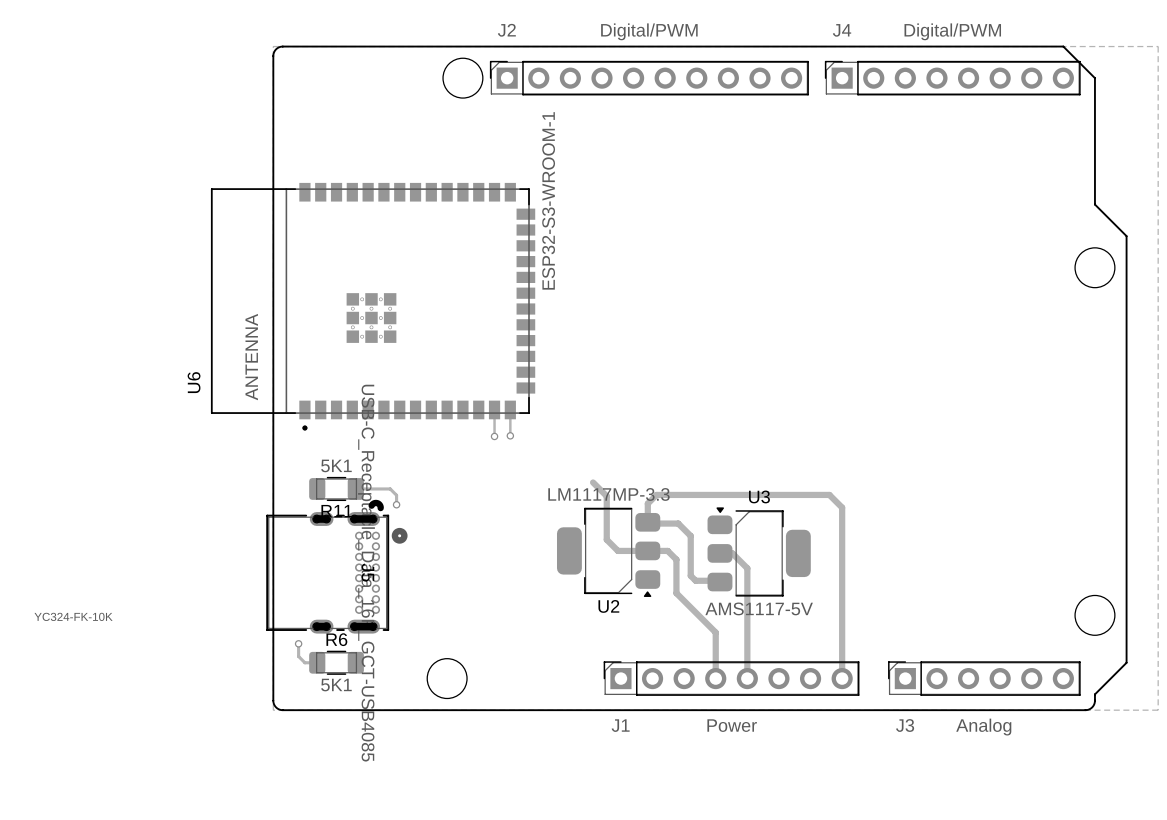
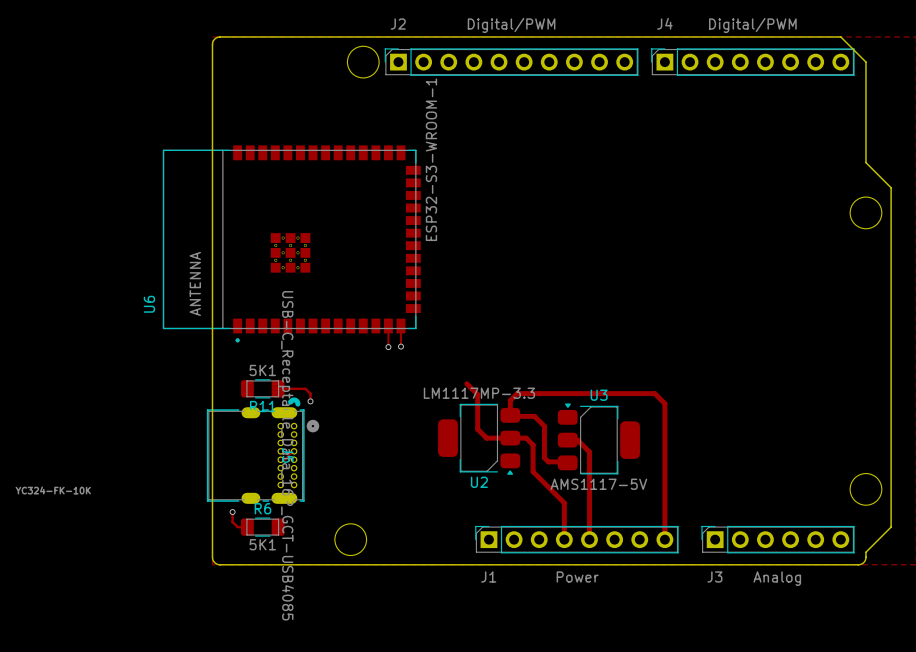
track: none -> (294, 451) (284, 459) (281, 459)

